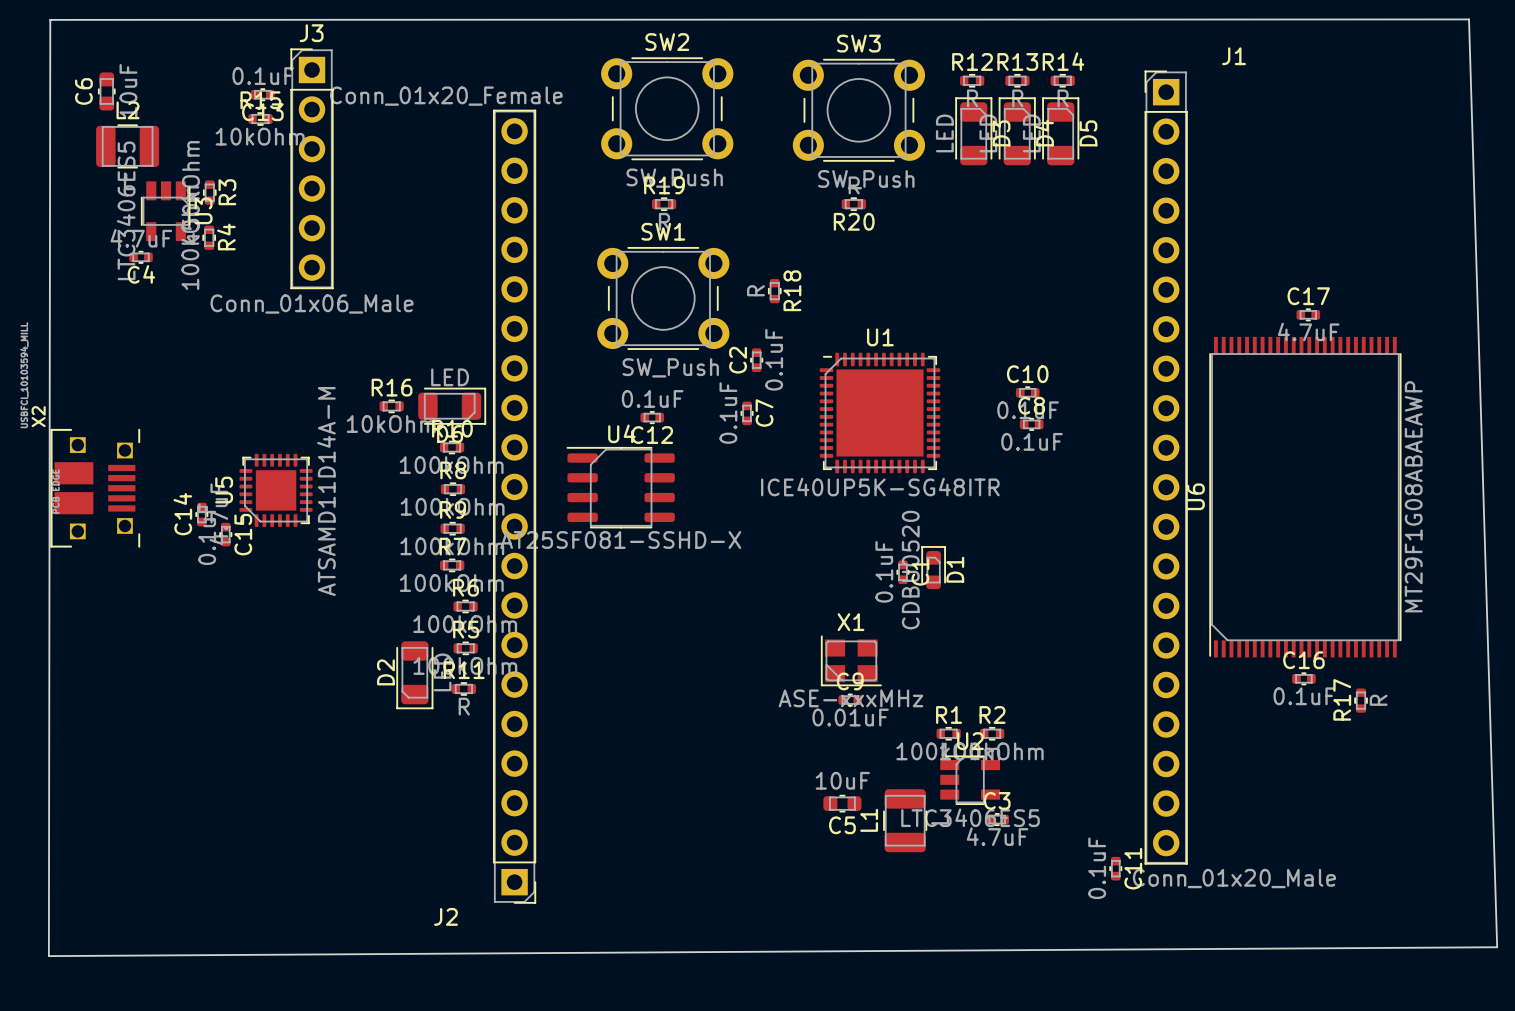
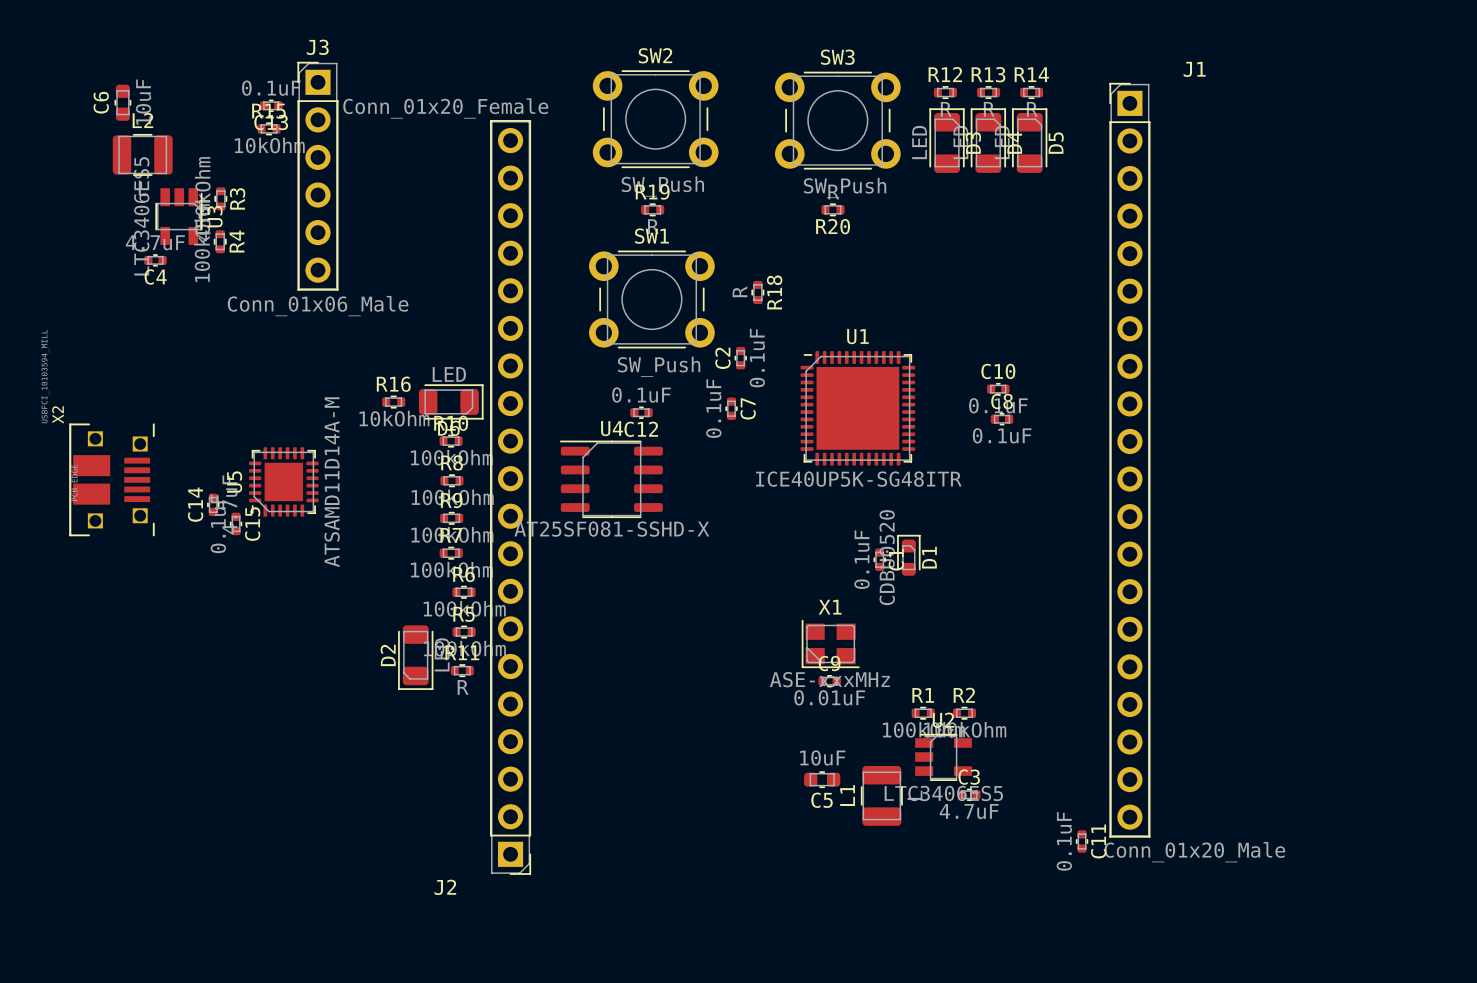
board edge: (1469, 19) (1497, 947) (48, 956) (50, 19) (1469, 19) -> none
C17: 4.7uF (1308, 314) -> none
U6: MT29F1G08ABAEAWP (1305, 497) -> none
C16: 0.1uF (1303, 678) -> none
R17: R (1361, 700) -> none

